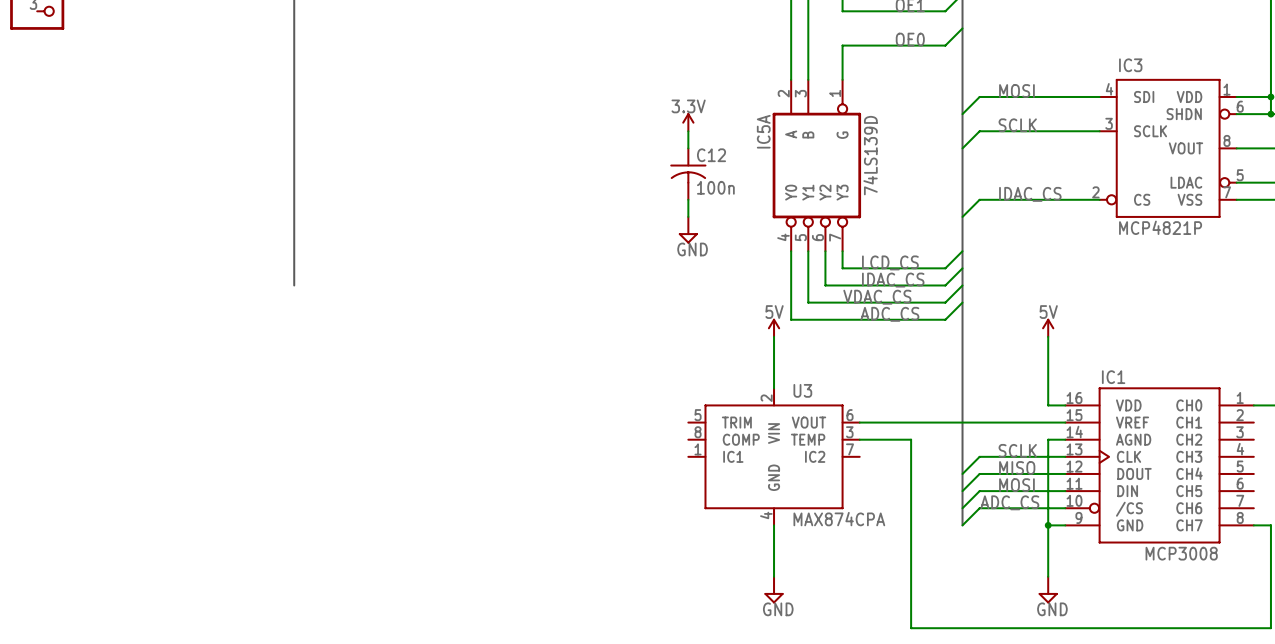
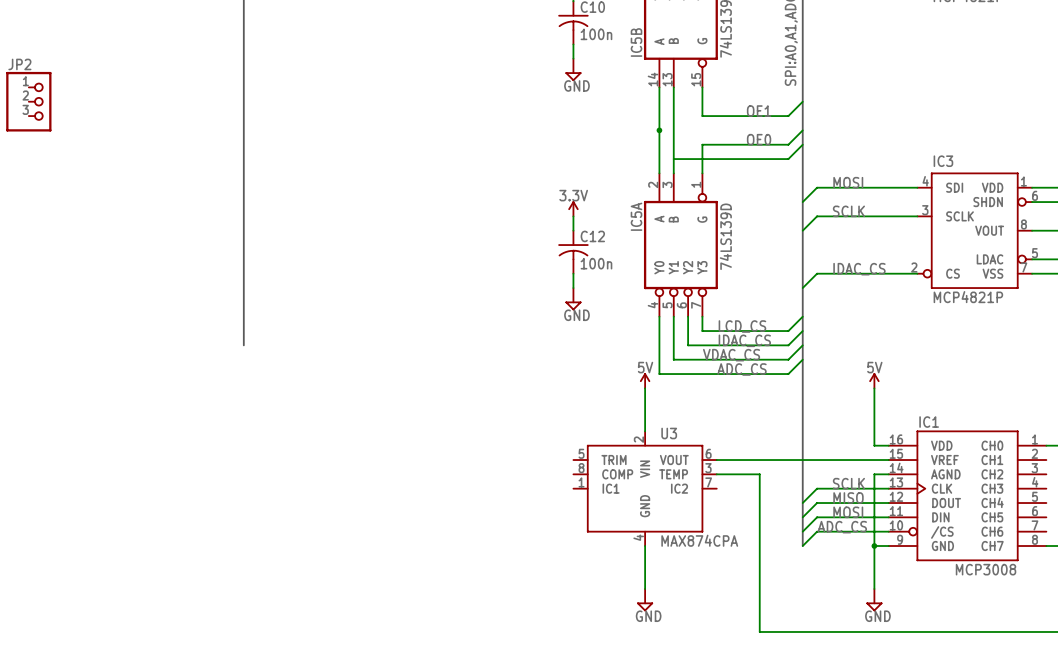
junction: none -> (659, 130)
wire: none -> (802, 144) (788, 159) (673, 159)

